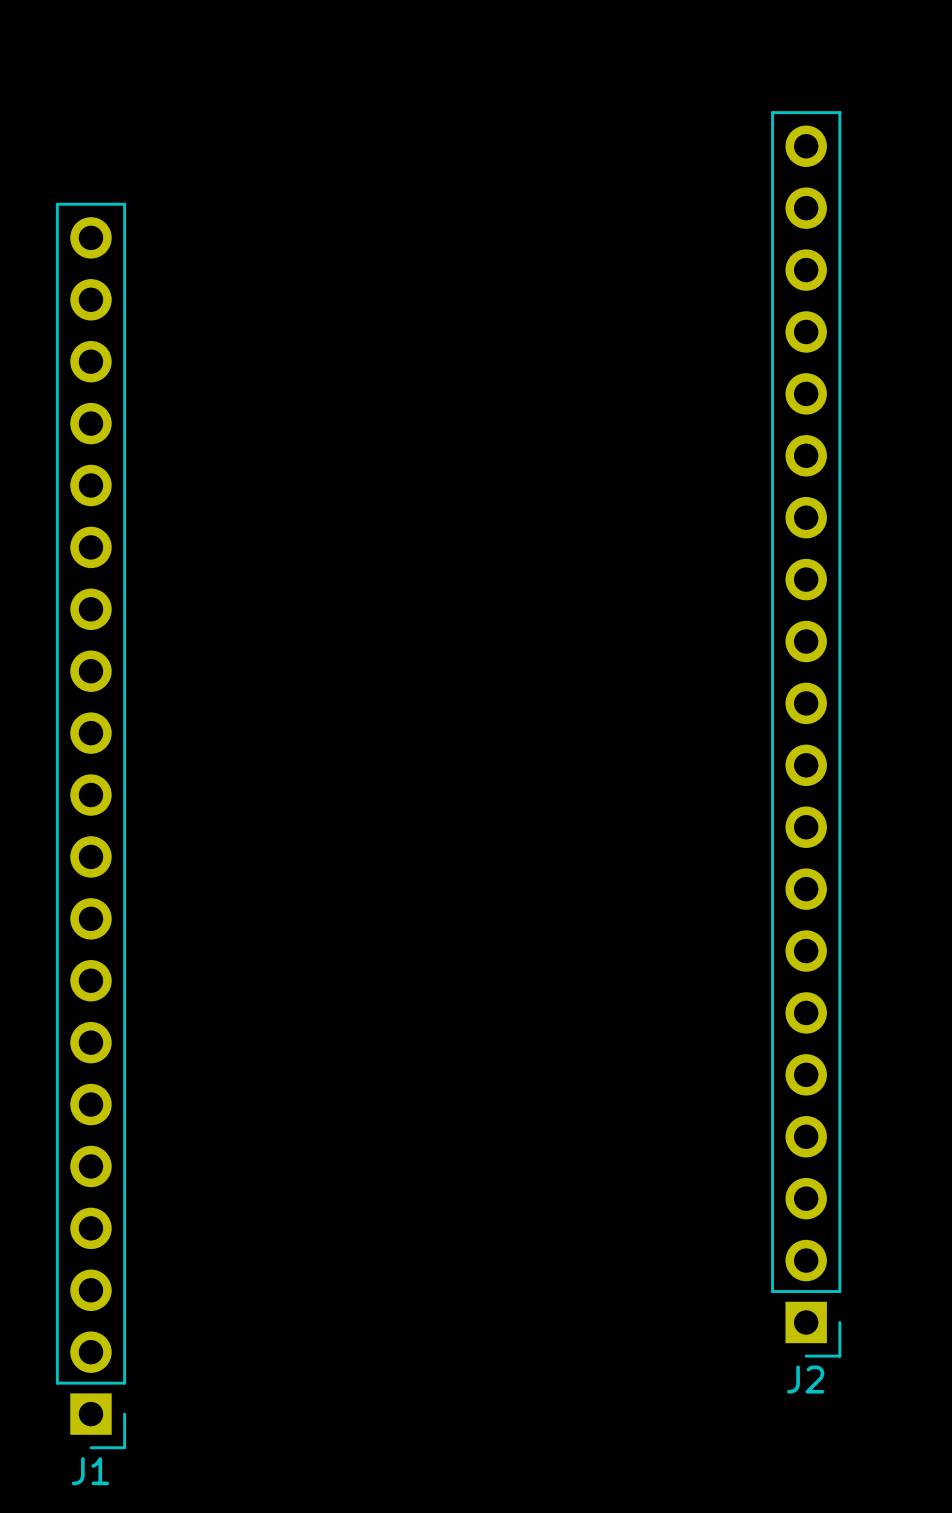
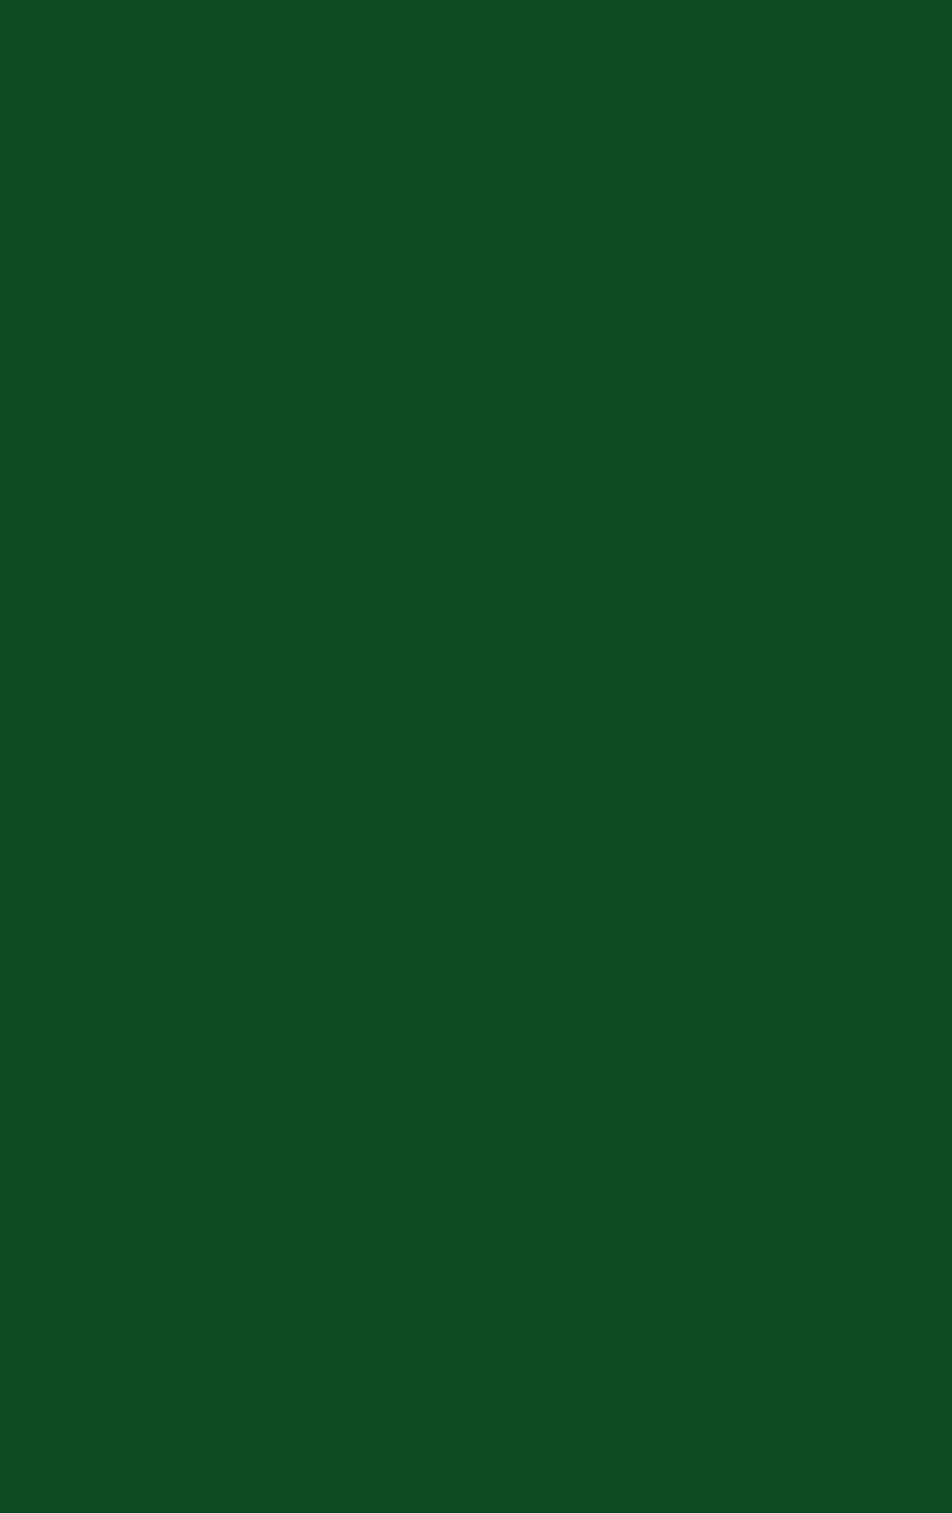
J2: (806, 734) -> none
J1: (90, 825) -> none

